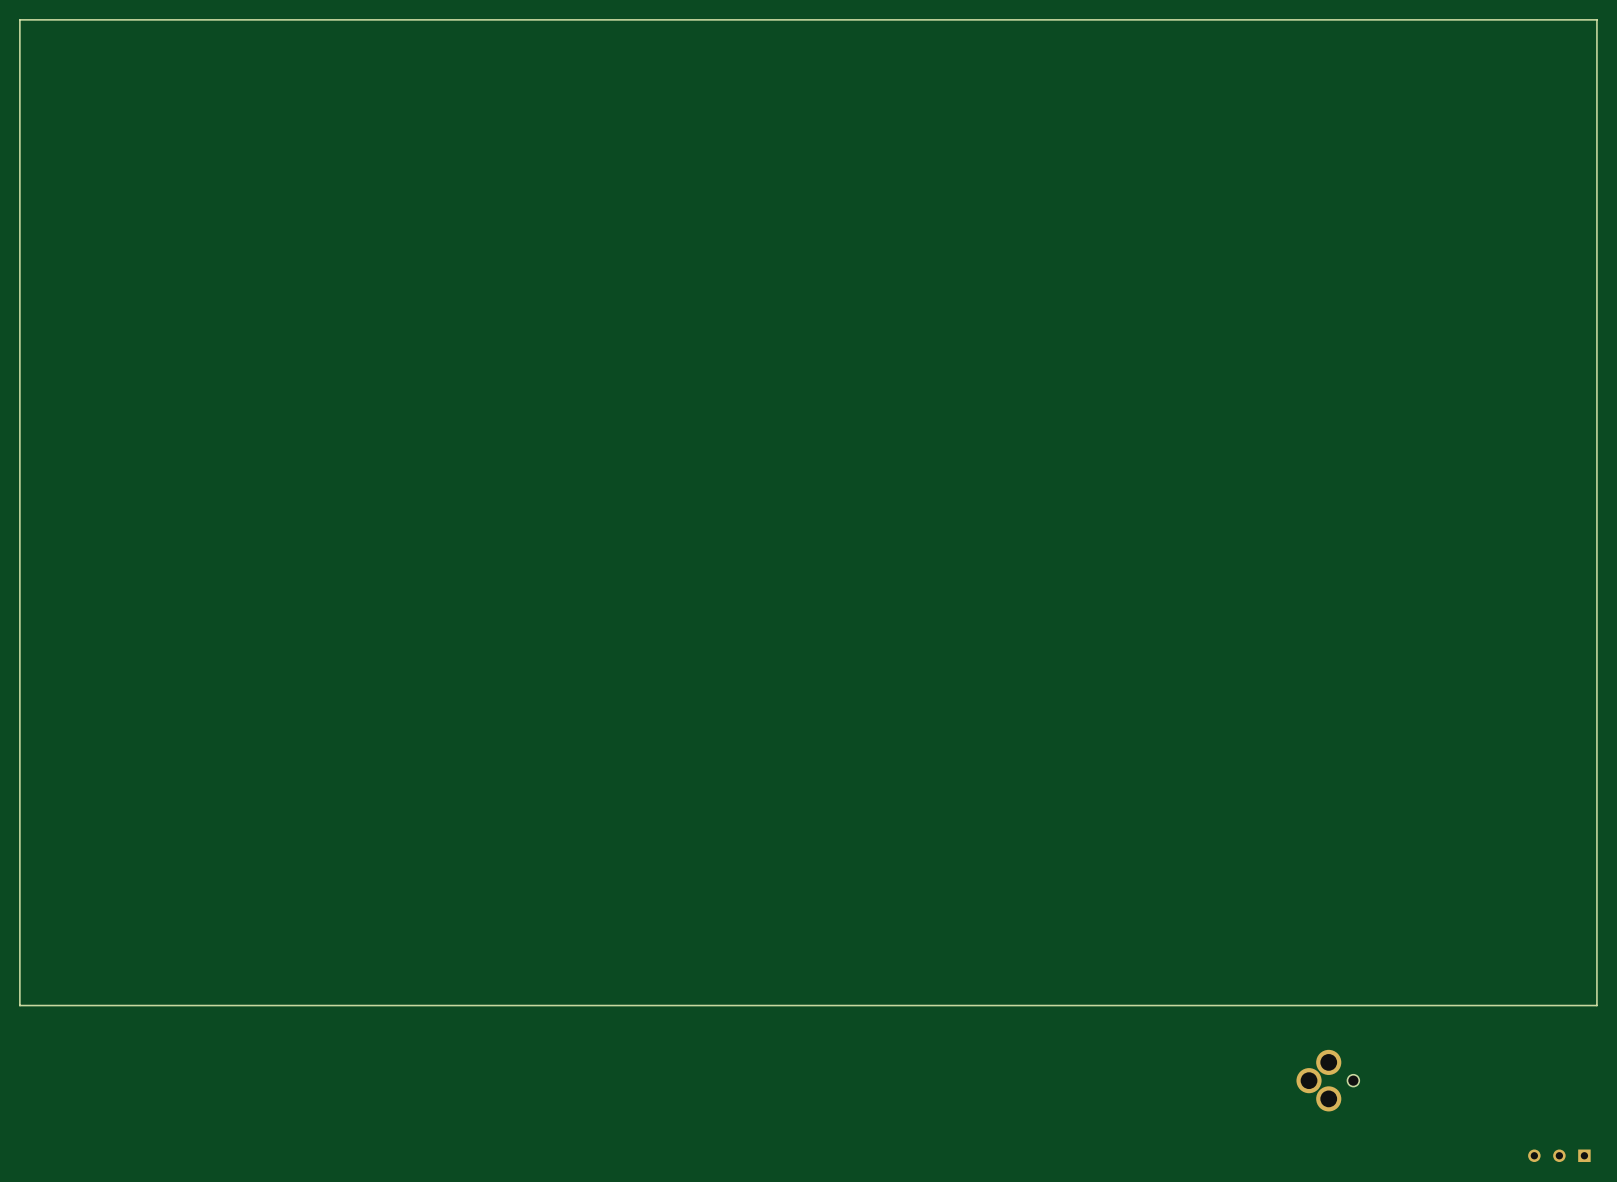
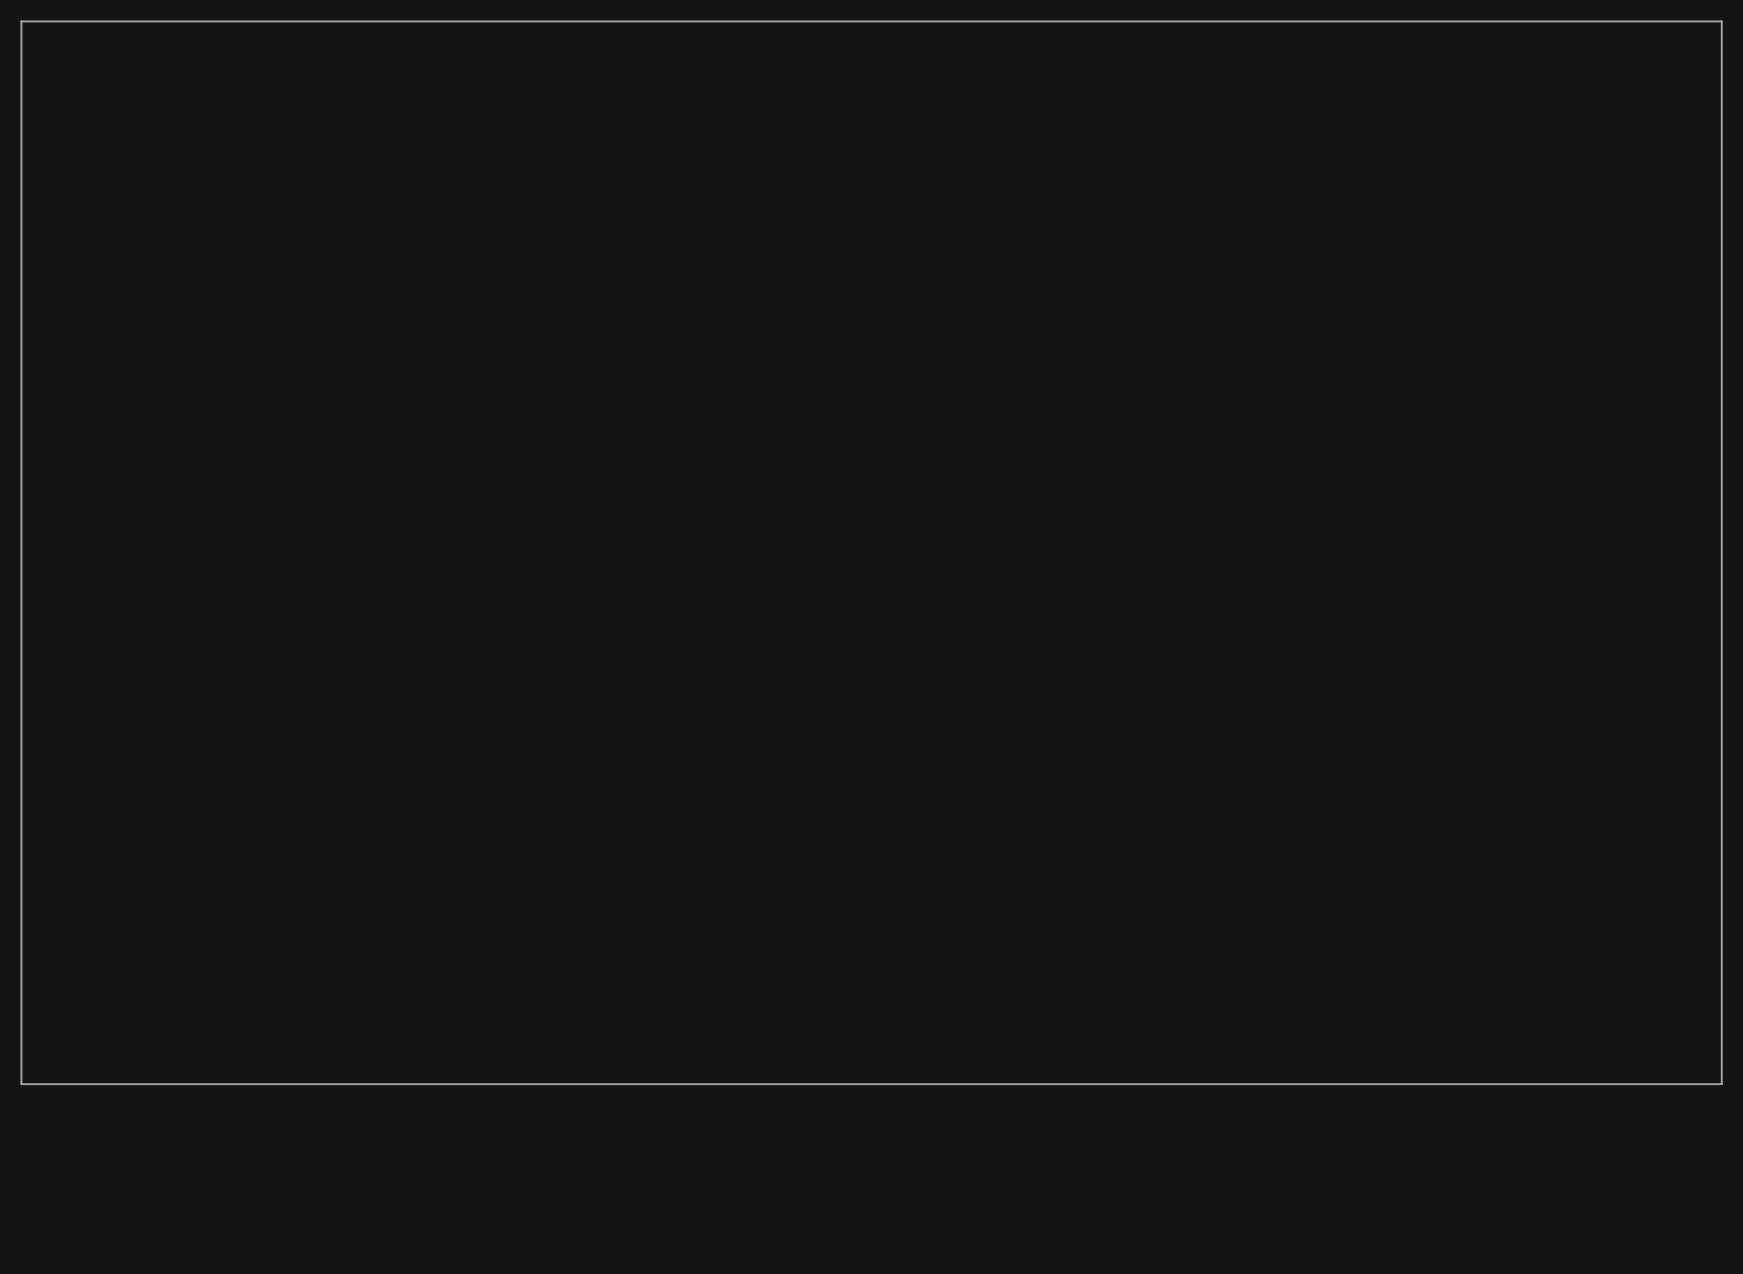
part: (1327, 1080) -> none
part: (1559, 1155) -> none

